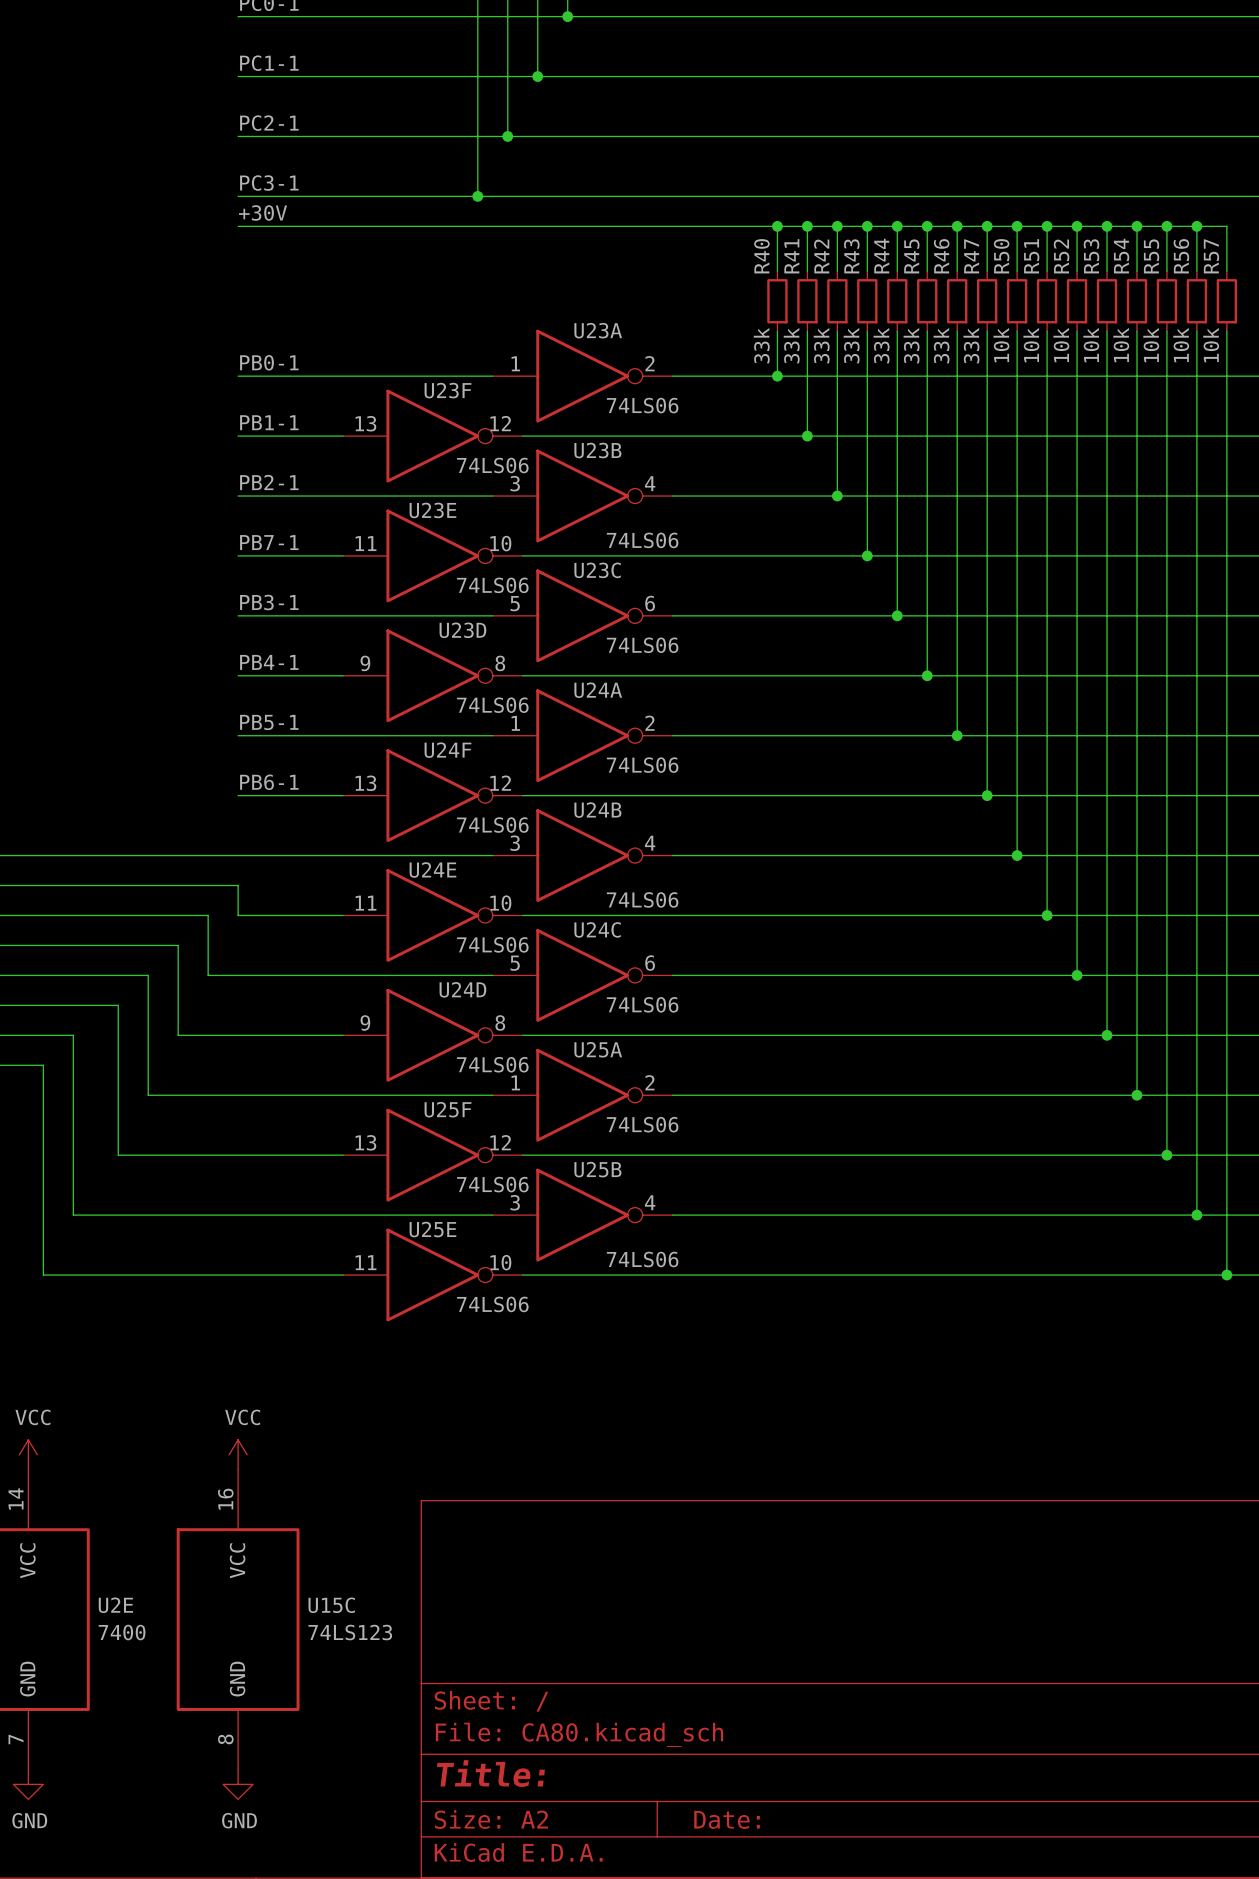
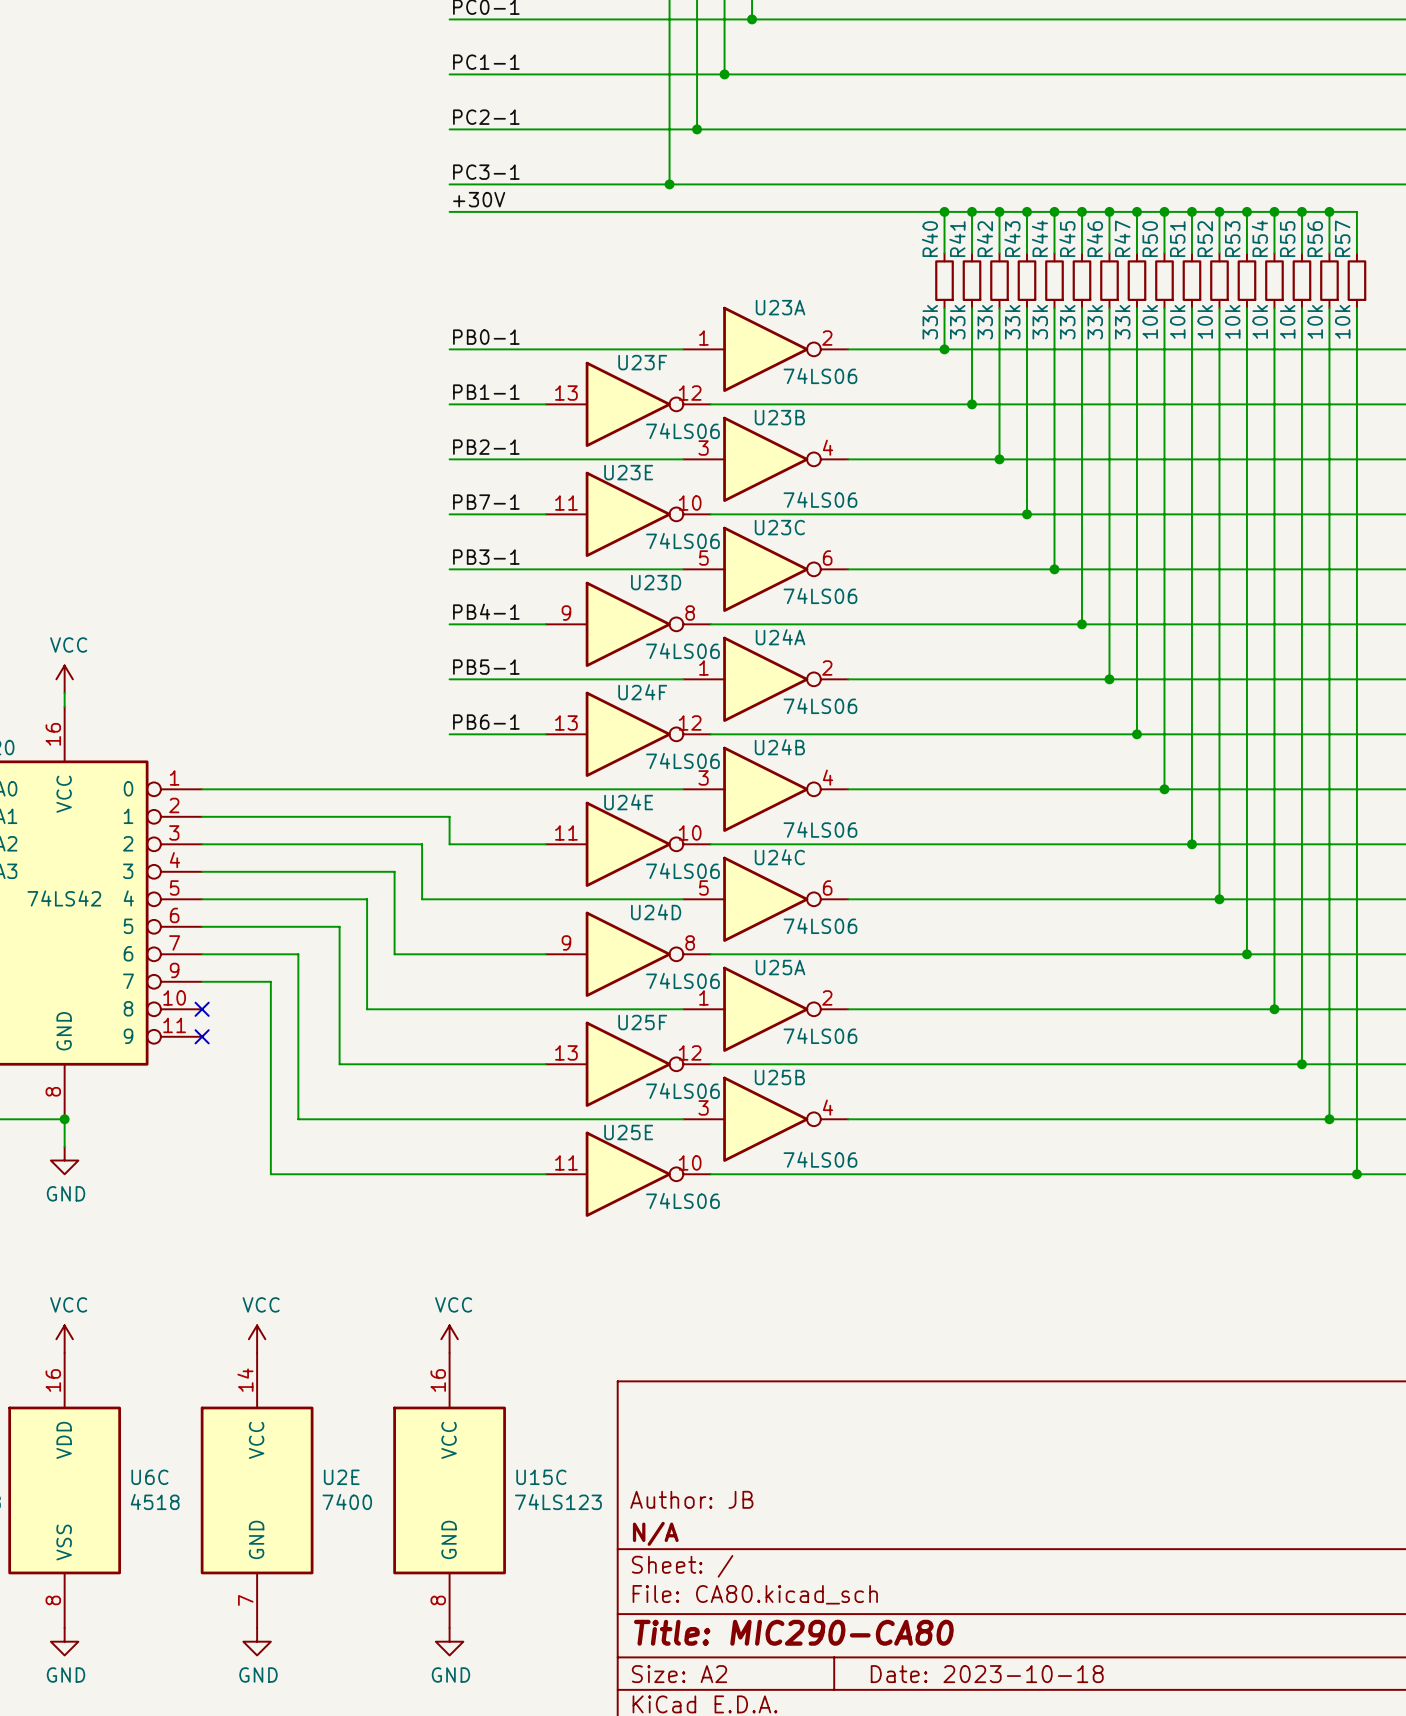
title block: none -> Author: JB (691, 1499)
title block: none -> N/A (655, 1533)
title block: Title: (490, 1773) -> Title: MIC290-CA80 (793, 1632)
title block: Date: (727, 1819) -> Date: 2023-10-18 (987, 1674)

